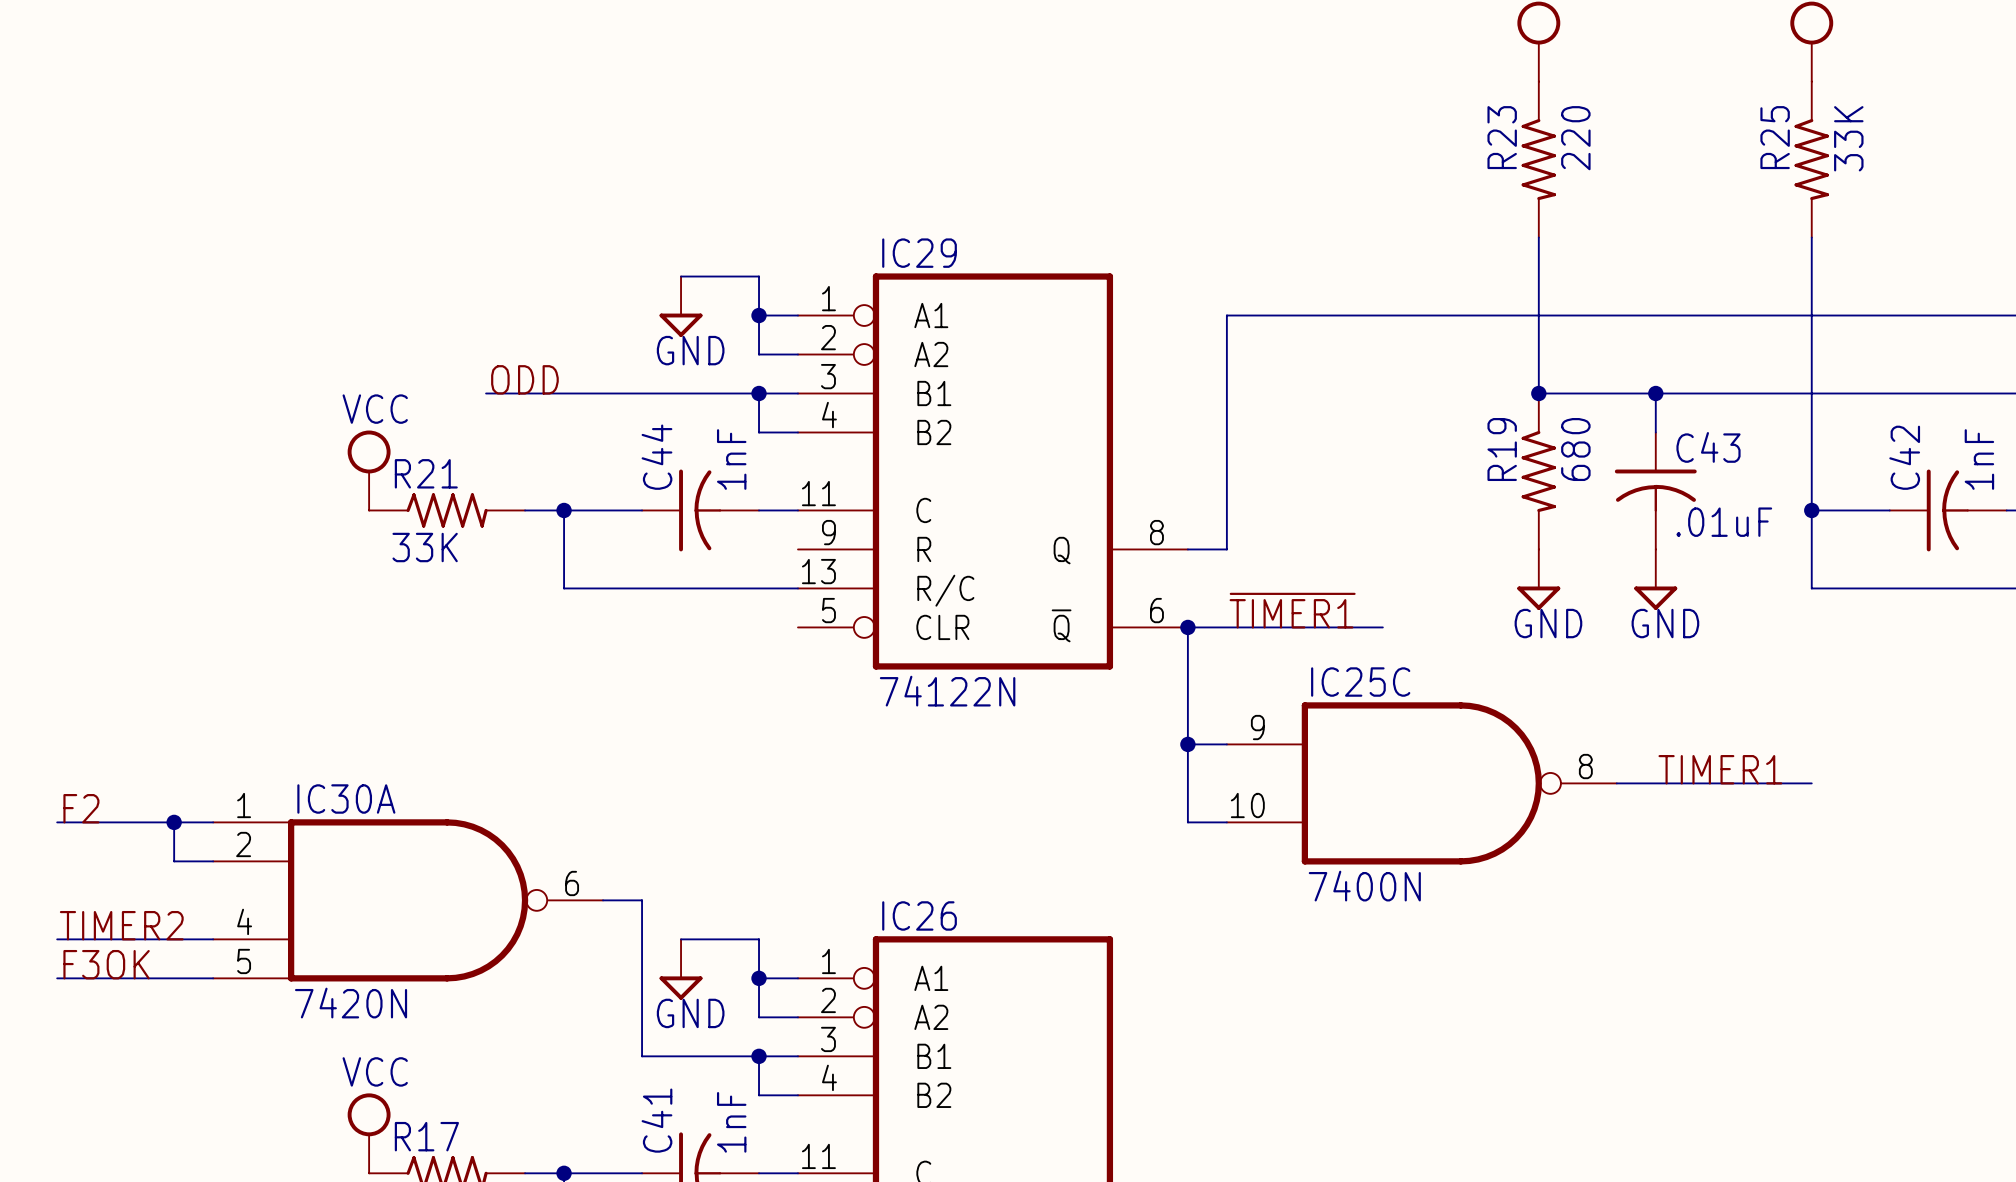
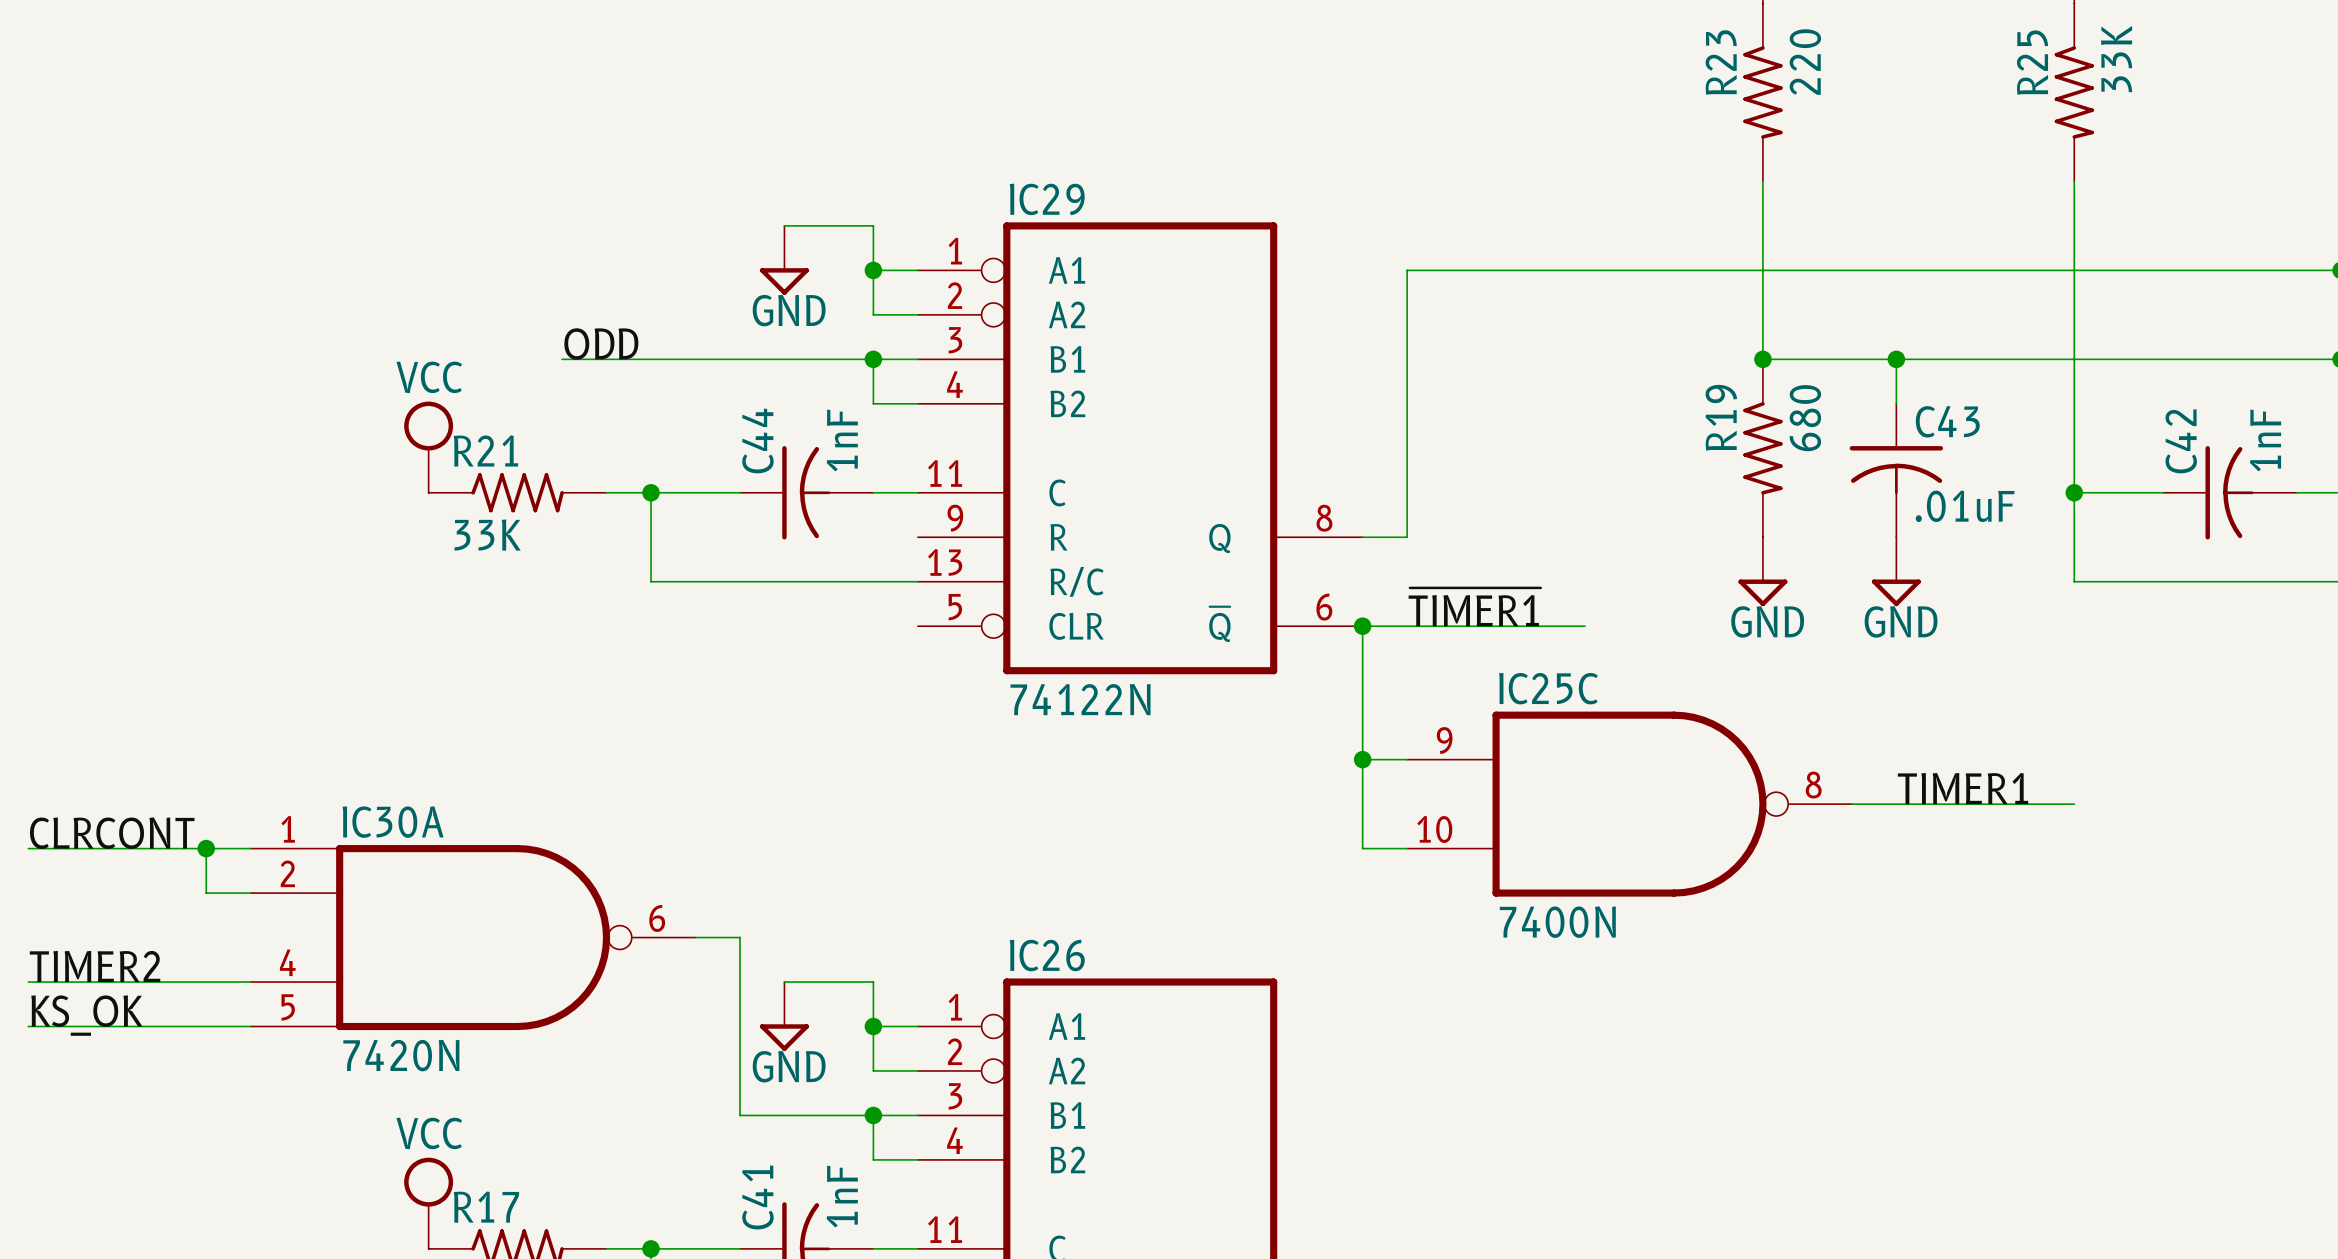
label: F2 (81, 808) -> none
label: none -> CLRCONT (112, 833)
wire: none -> (28, 848) (72, 848)
label position: TIMER2 (121, 925) -> TIMER2 (95, 966)
wire: none -> (28, 982) (72, 982)
label: F3OK (106, 964) -> none
label: none -> KS_OK (86, 1015)
wire: none -> (28, 1026) (72, 1026)

